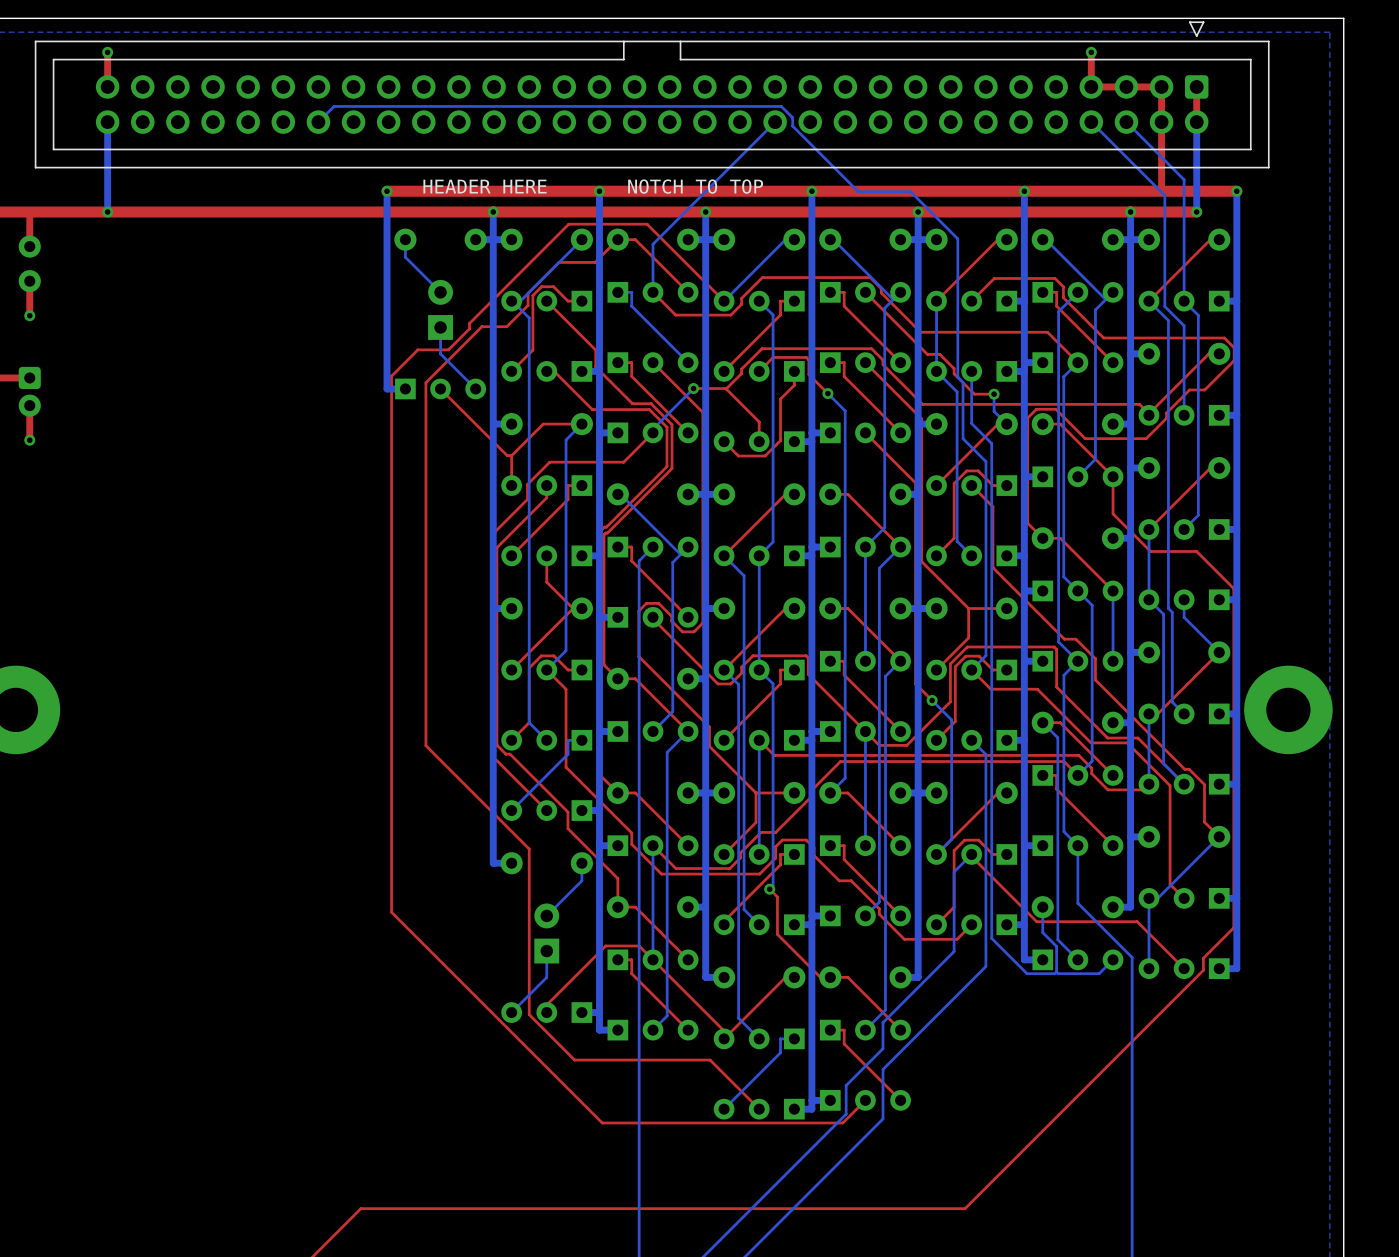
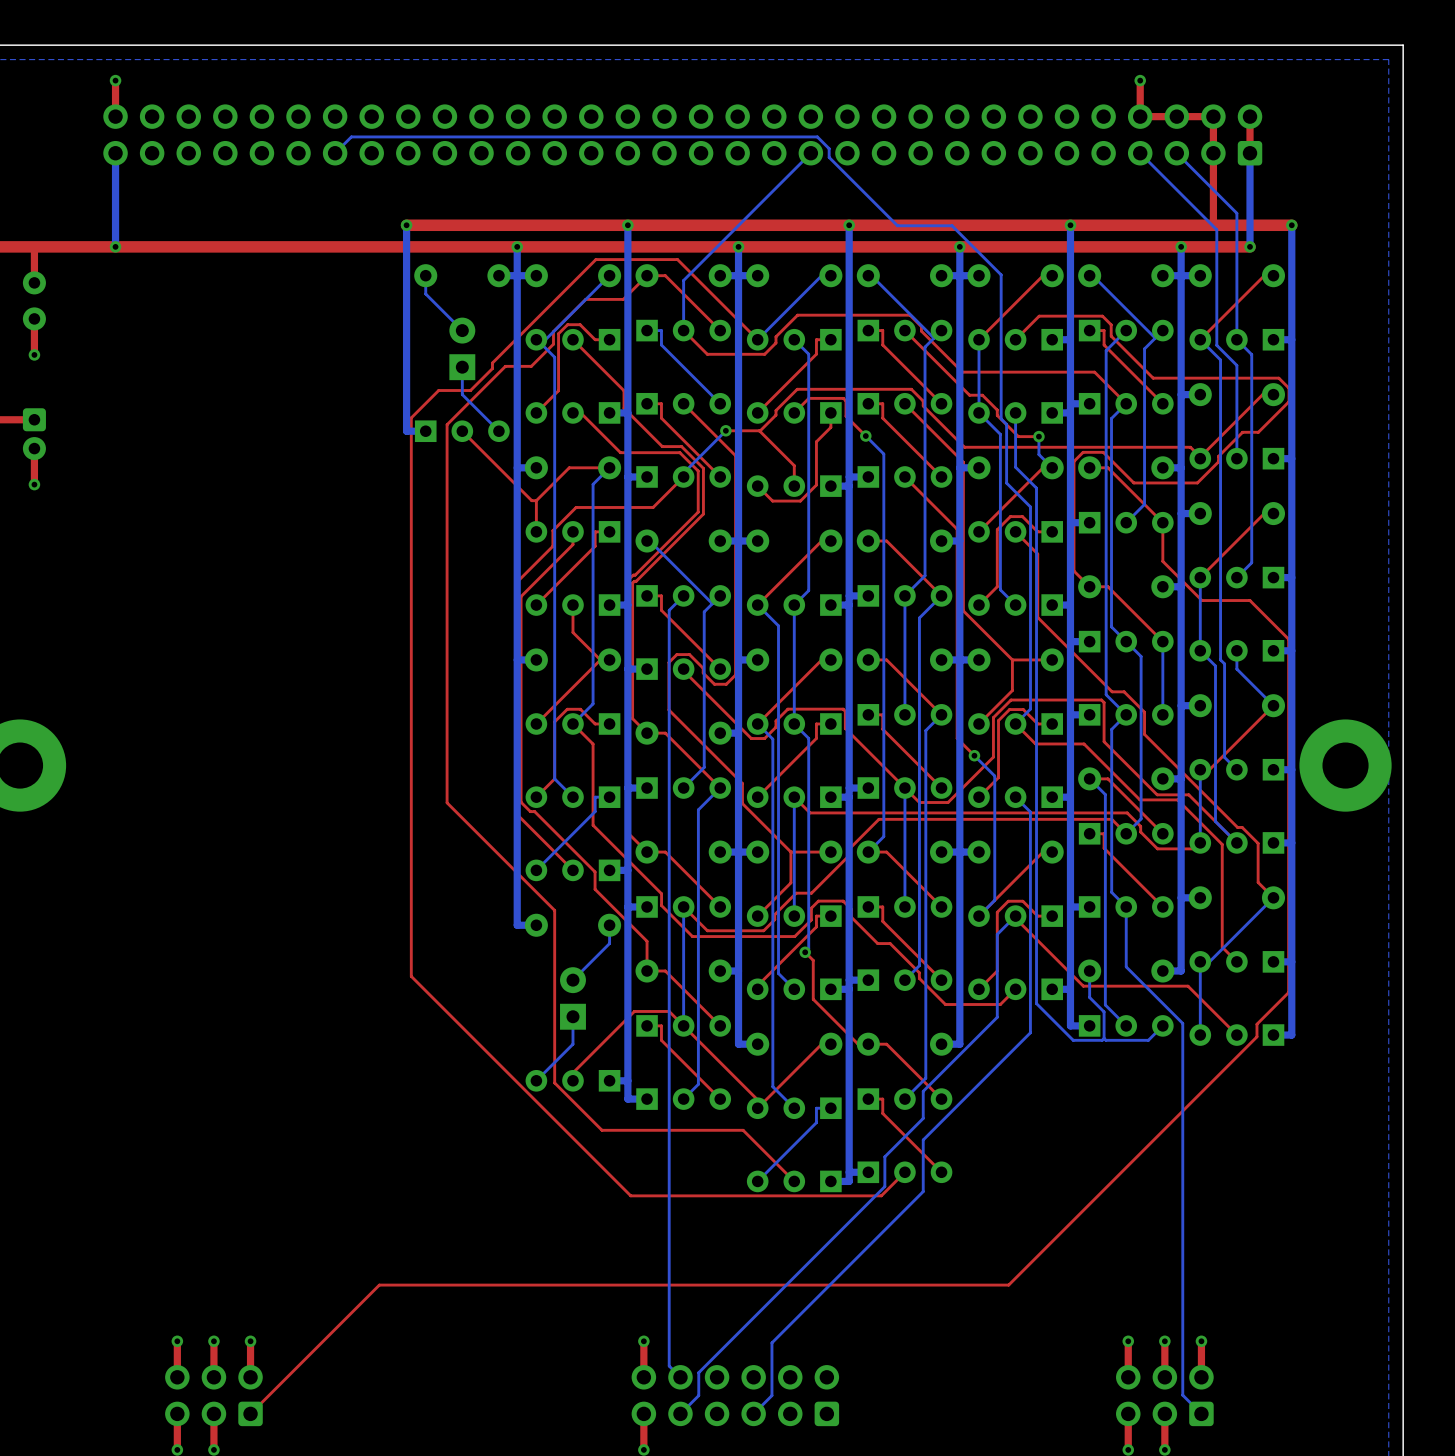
part side: bottom (652, 94) -> top (682, 134)
text: HEADER HERE (485, 186) -> none
text: NOTCH TO TOP (695, 186) -> none

